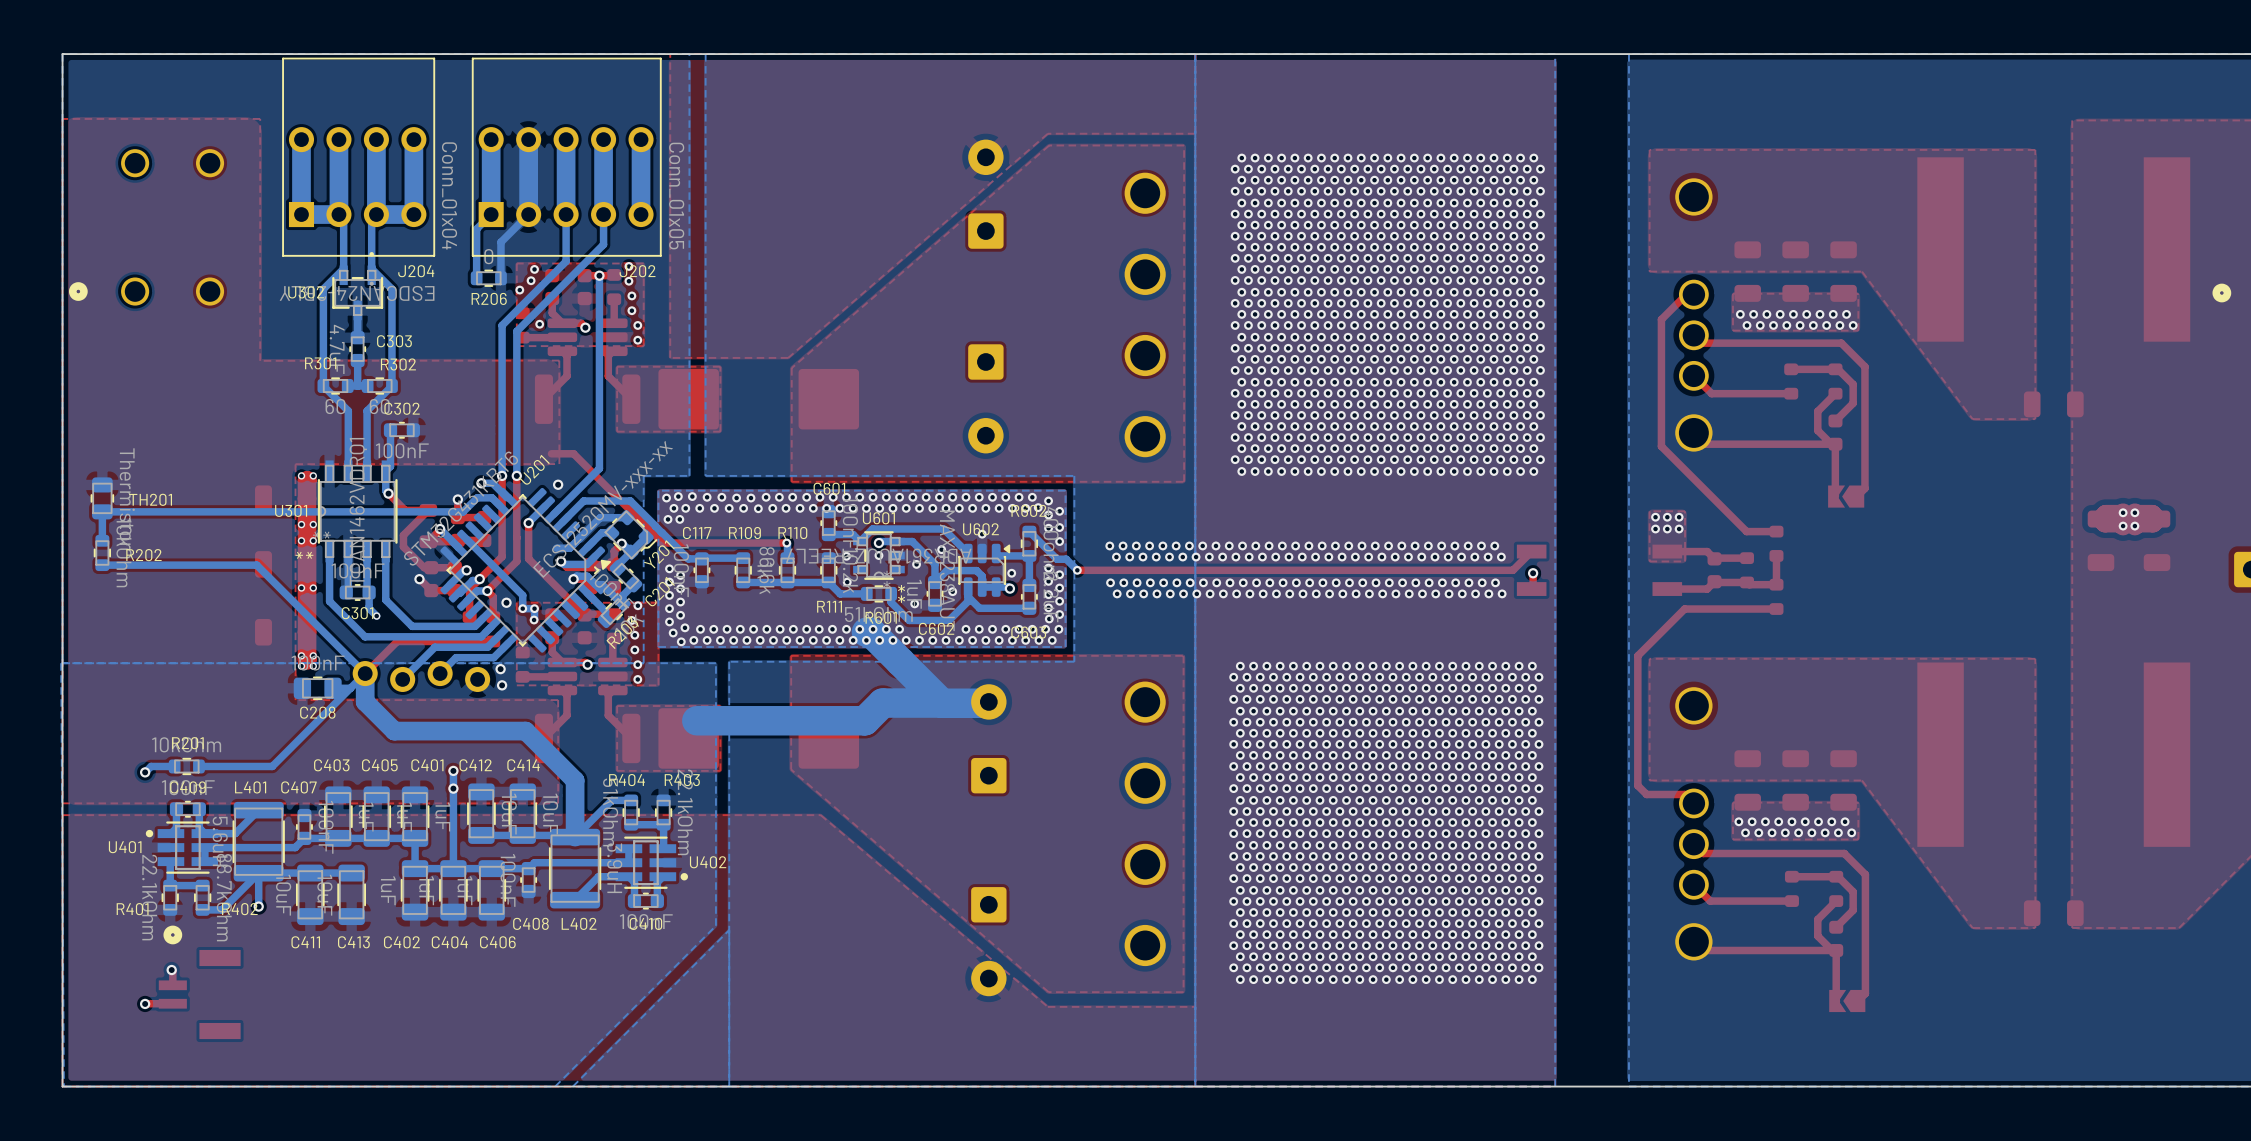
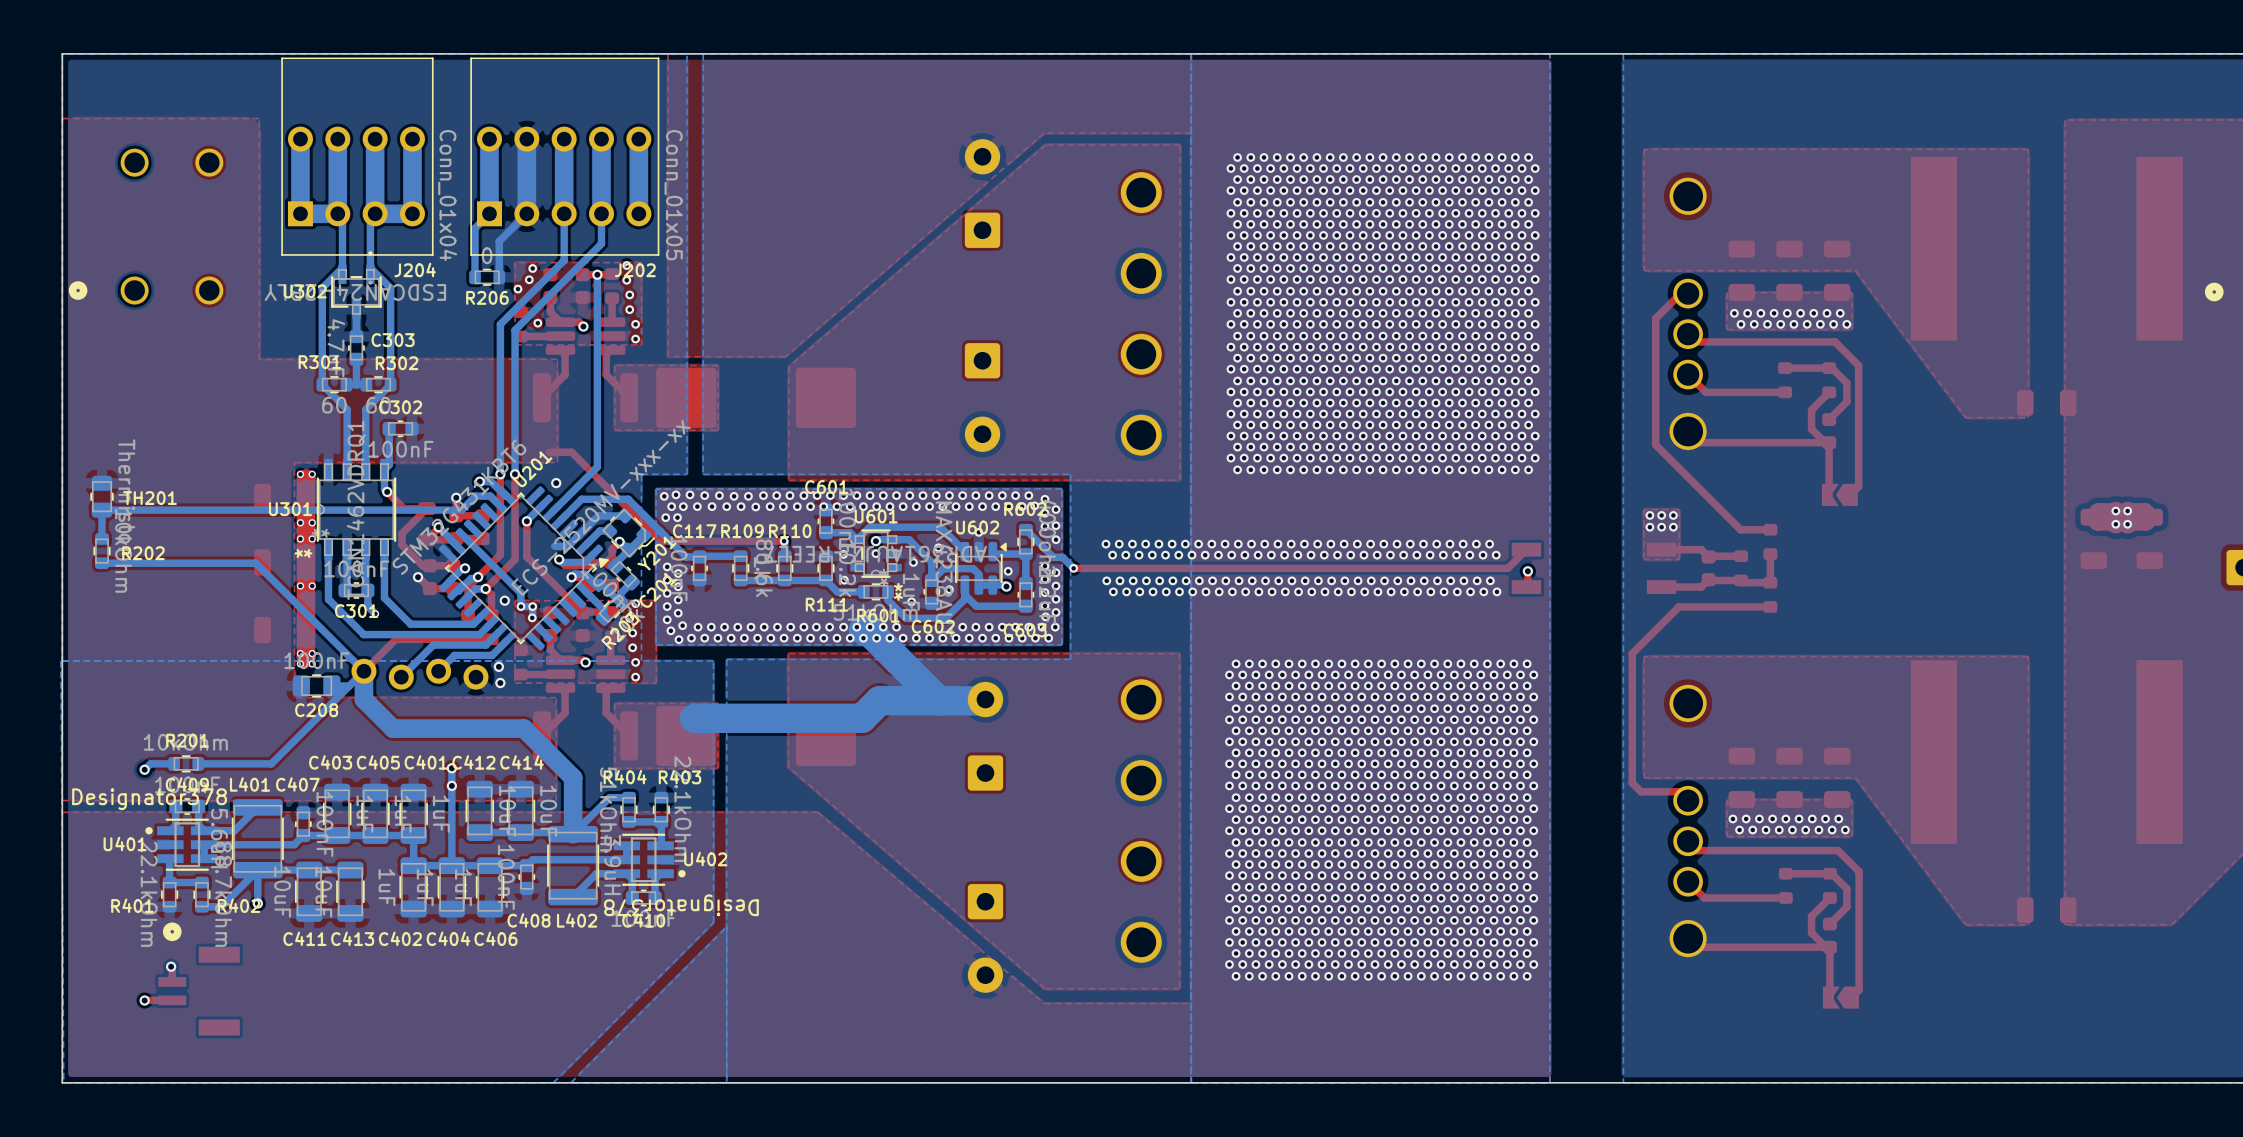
U401 text: none -> Designator378 (149, 799)
U402 text: none -> Designator378 (681, 905)

